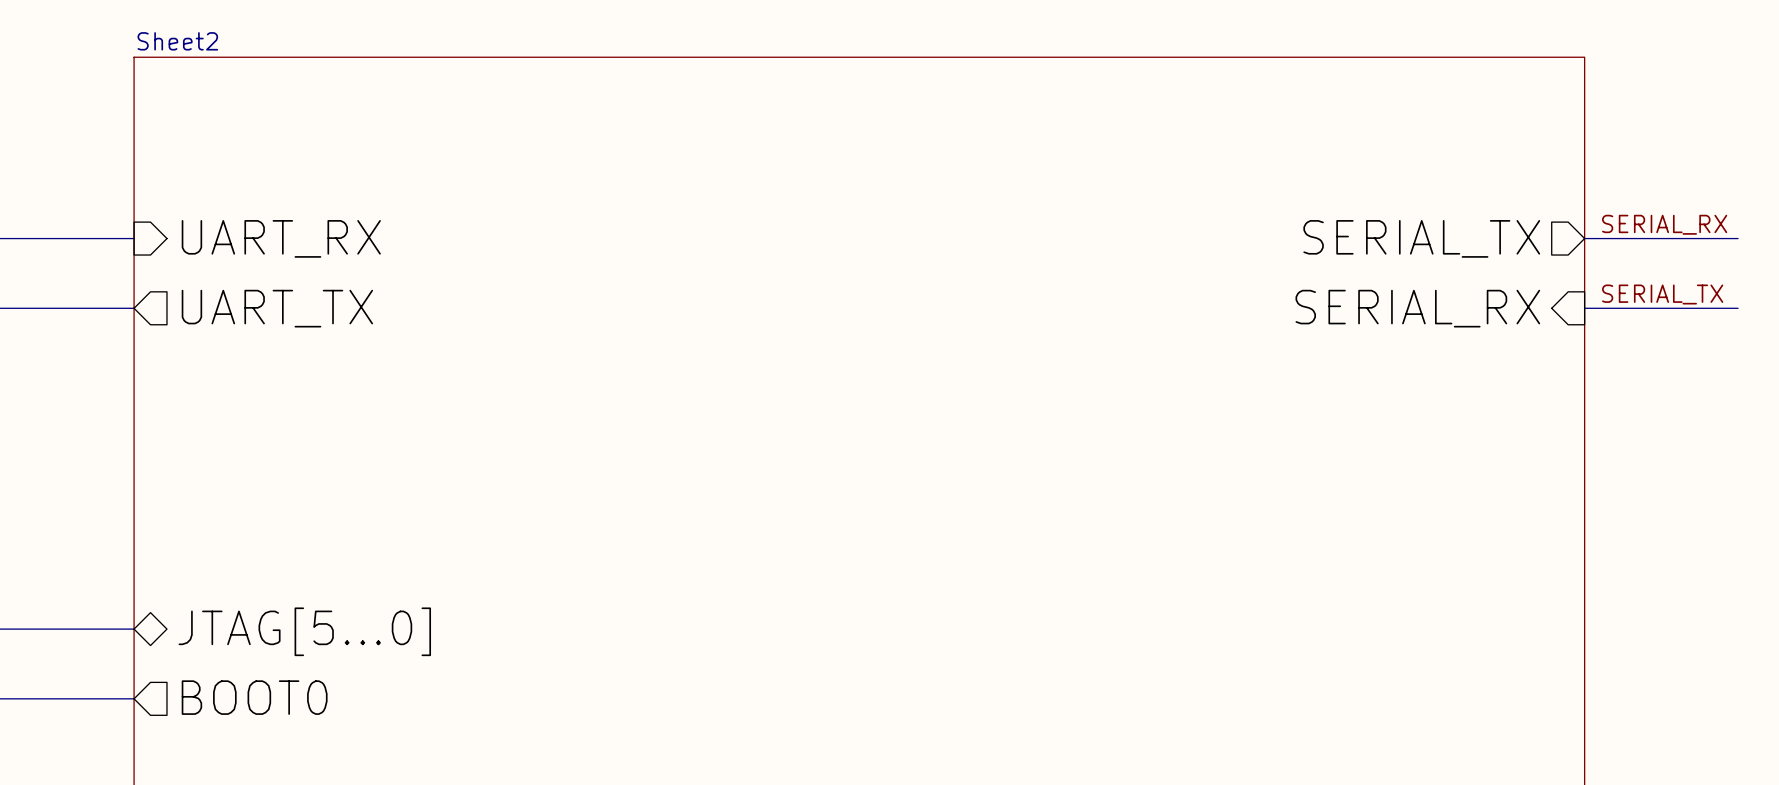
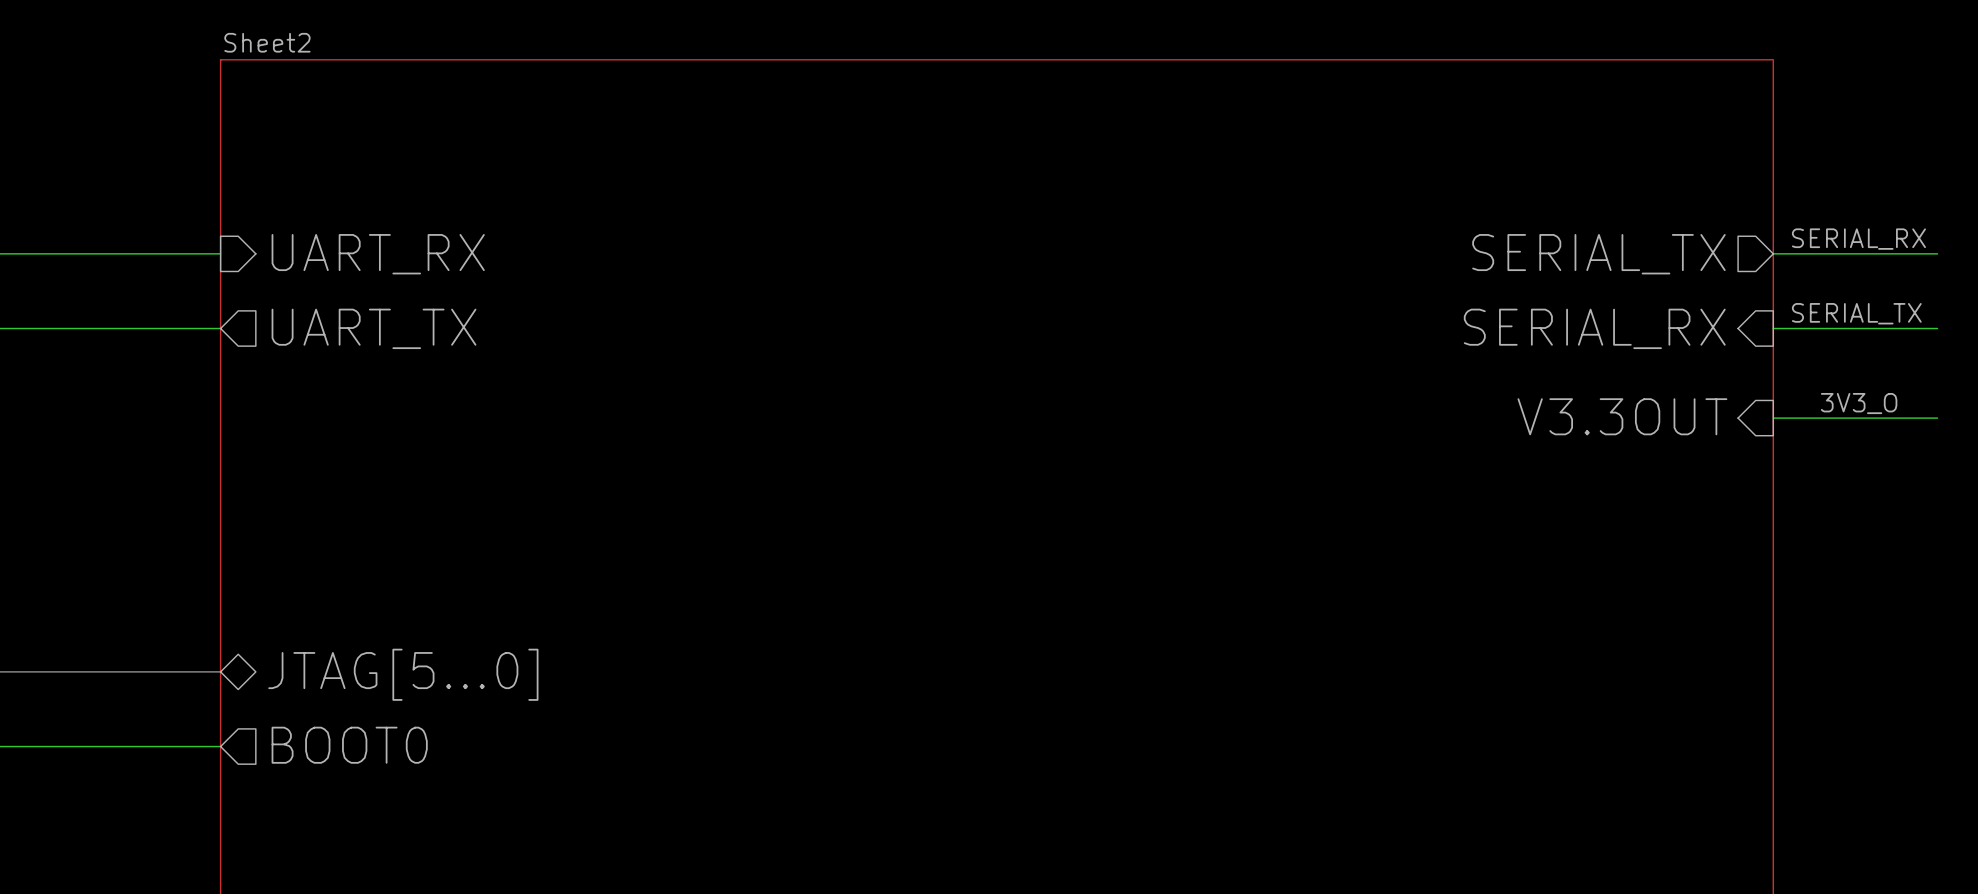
label: none -> 3V3_O (1859, 403)
sheet pin: none -> V3.3OUT (1622, 416)
wire: none -> (1773, 418) (1937, 418)

